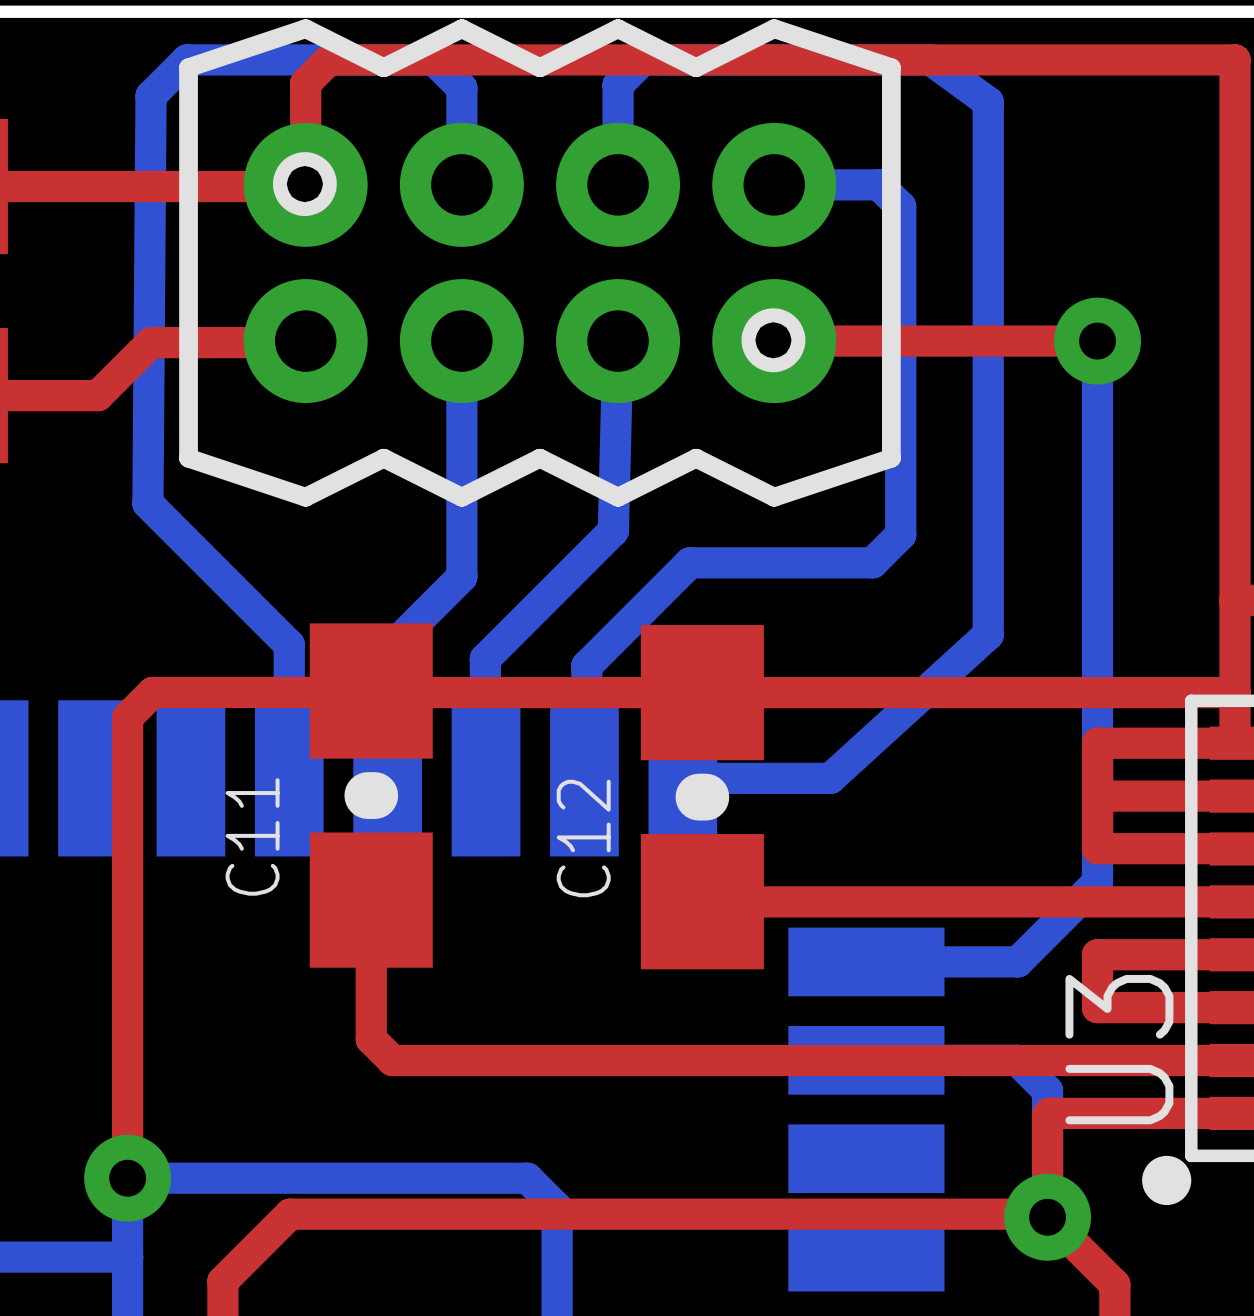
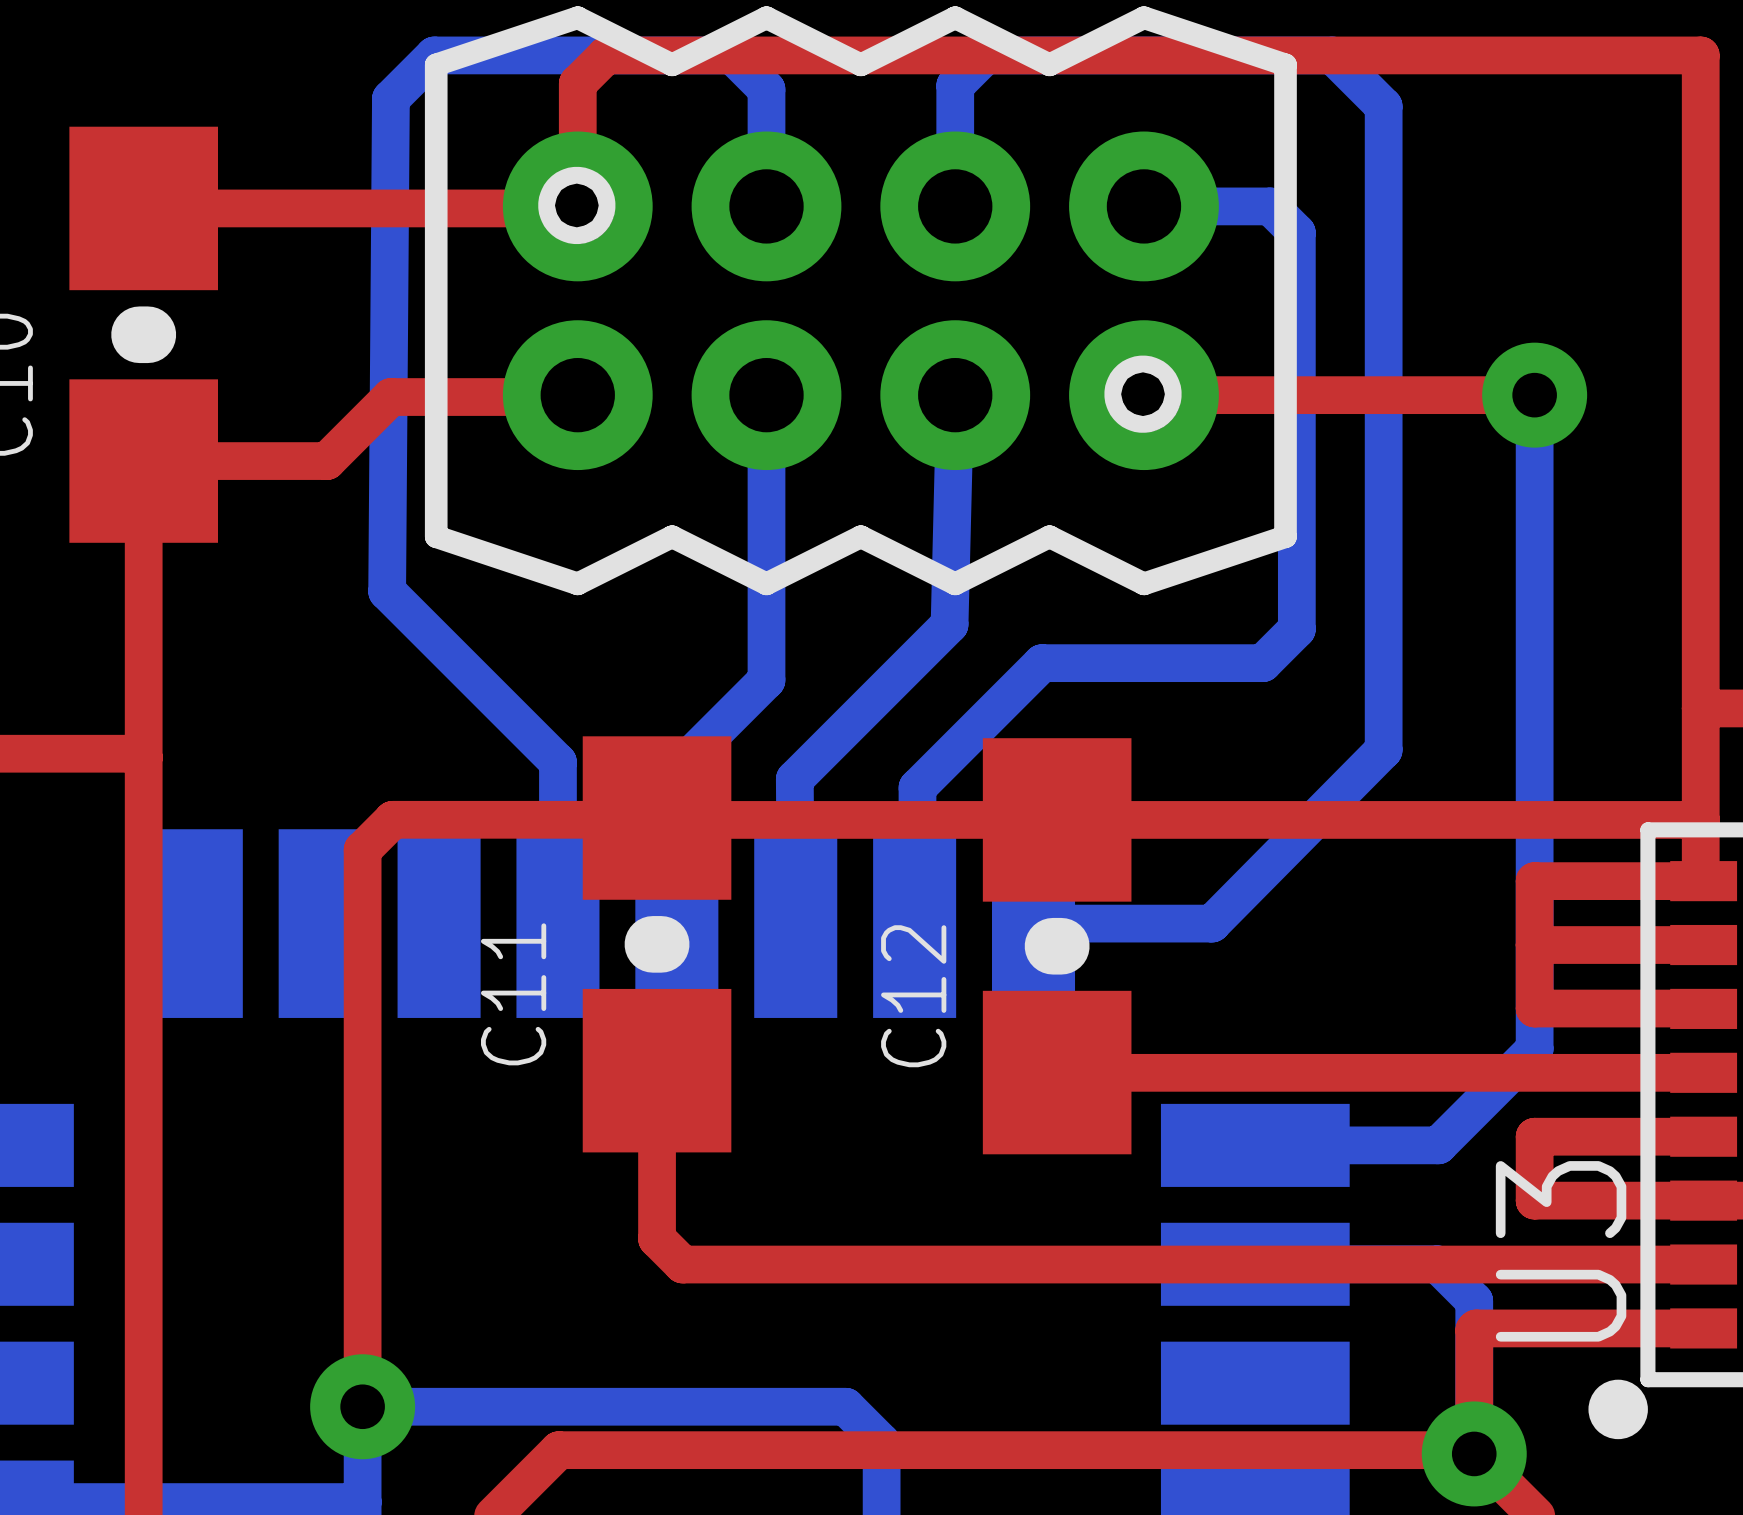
bottom track: (930, 59) (988, 102) (988, 634) (830, 778) -> (1332, 55) (1383, 106) (1383, 749) (1211, 923)

